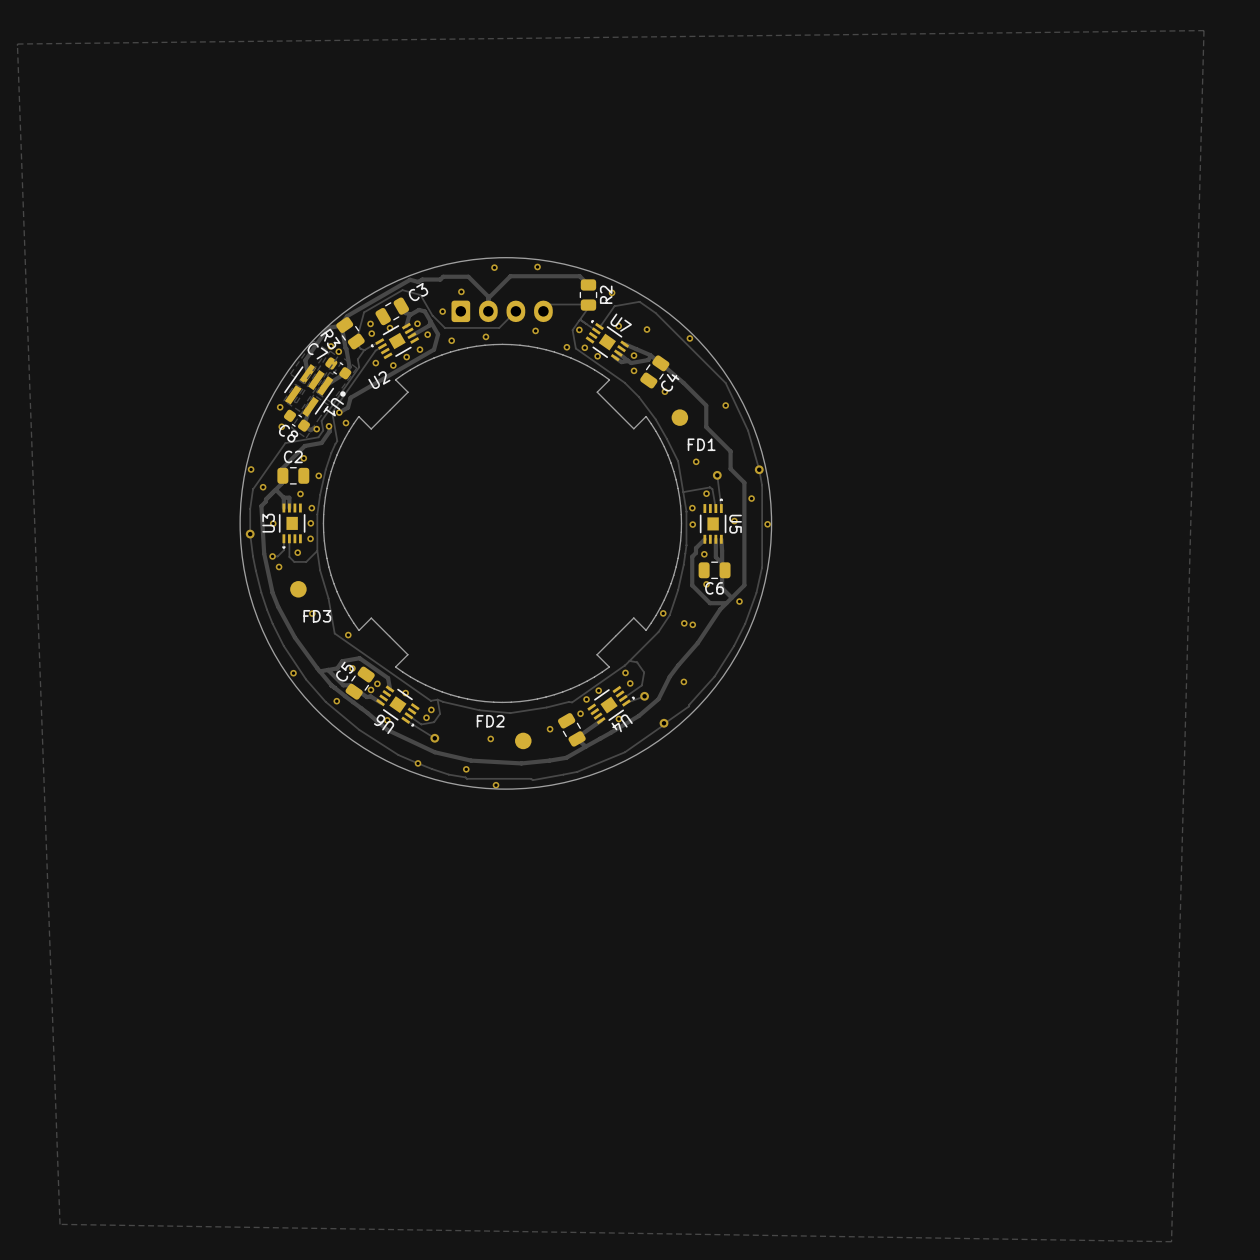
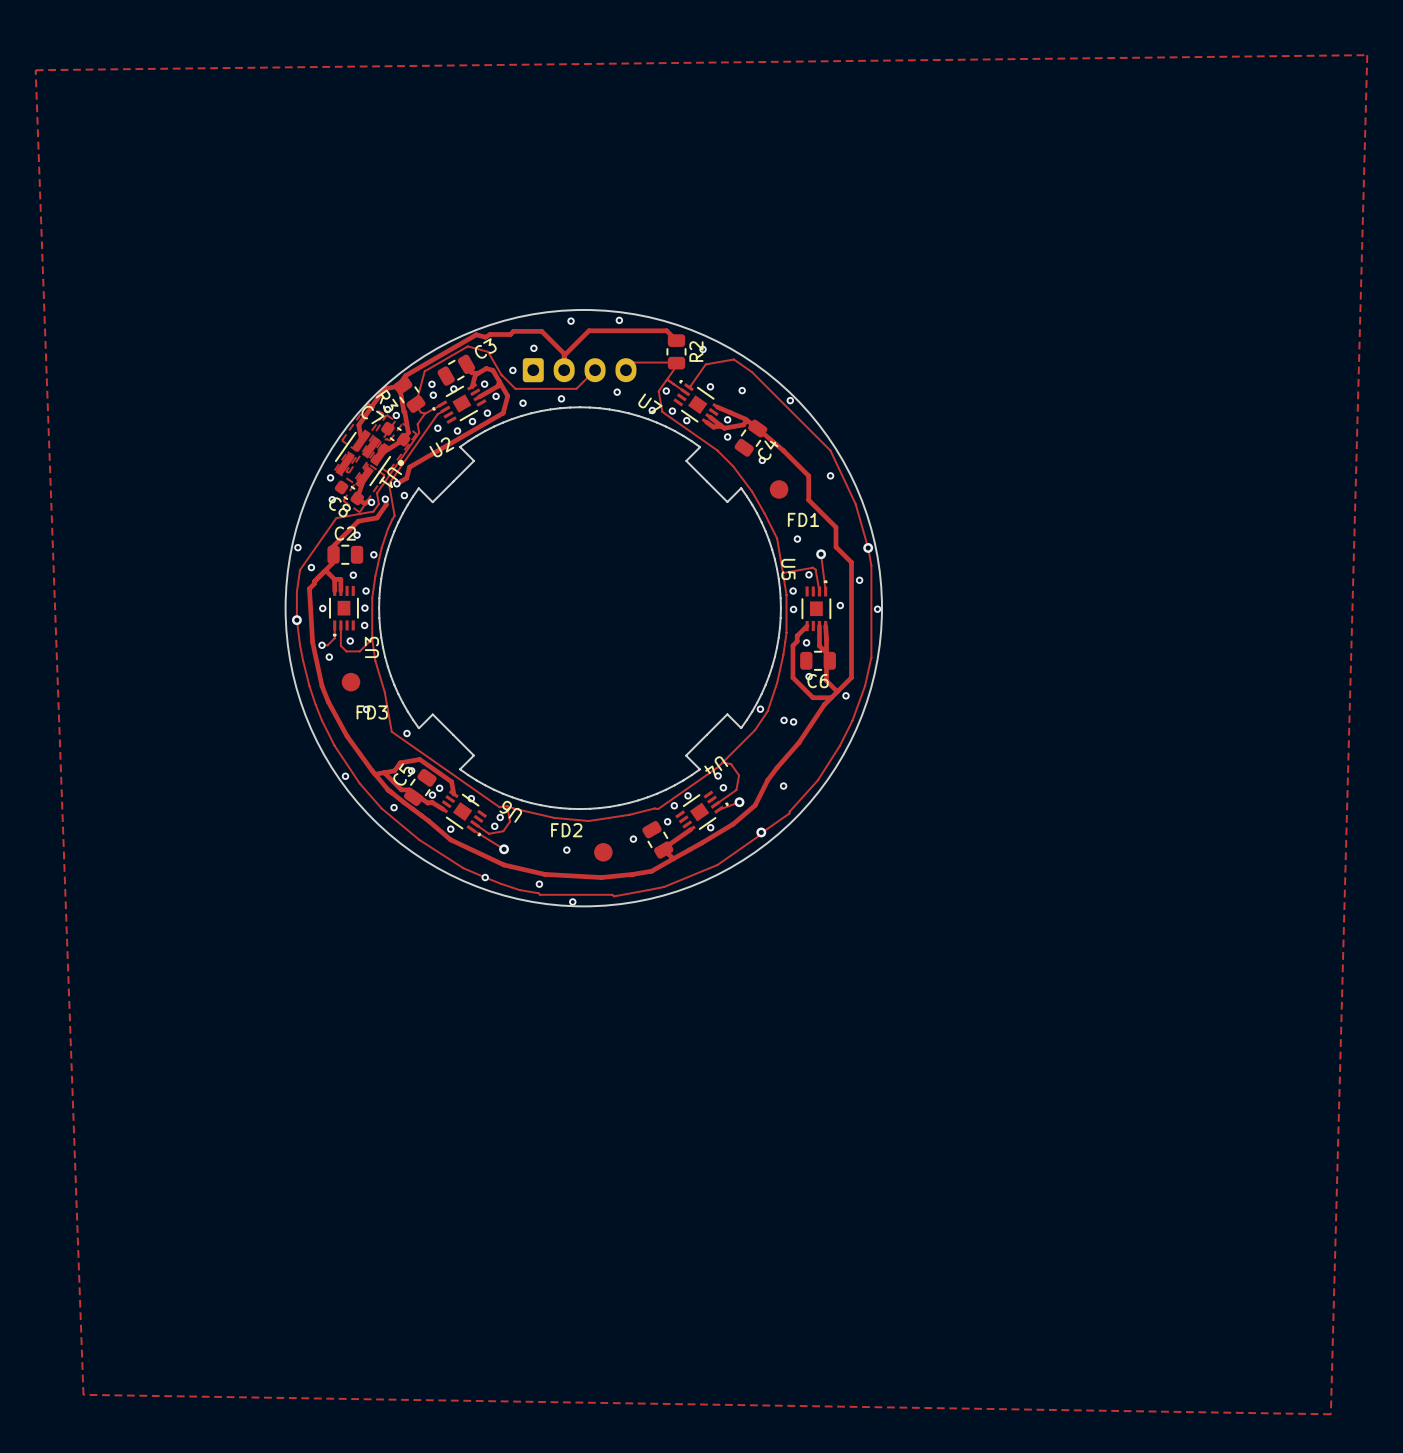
U7 name position: U7 (621, 322) -> U7 (650, 403)
U3 name position: U3 (268, 523) -> U3 (371, 647)
U5 name position: U5 (735, 524) -> U5 (788, 569)
U4 name position: U4 (622, 723) -> U4 (716, 766)
U6 name position: U6 (384, 724) -> U6 (510, 811)

